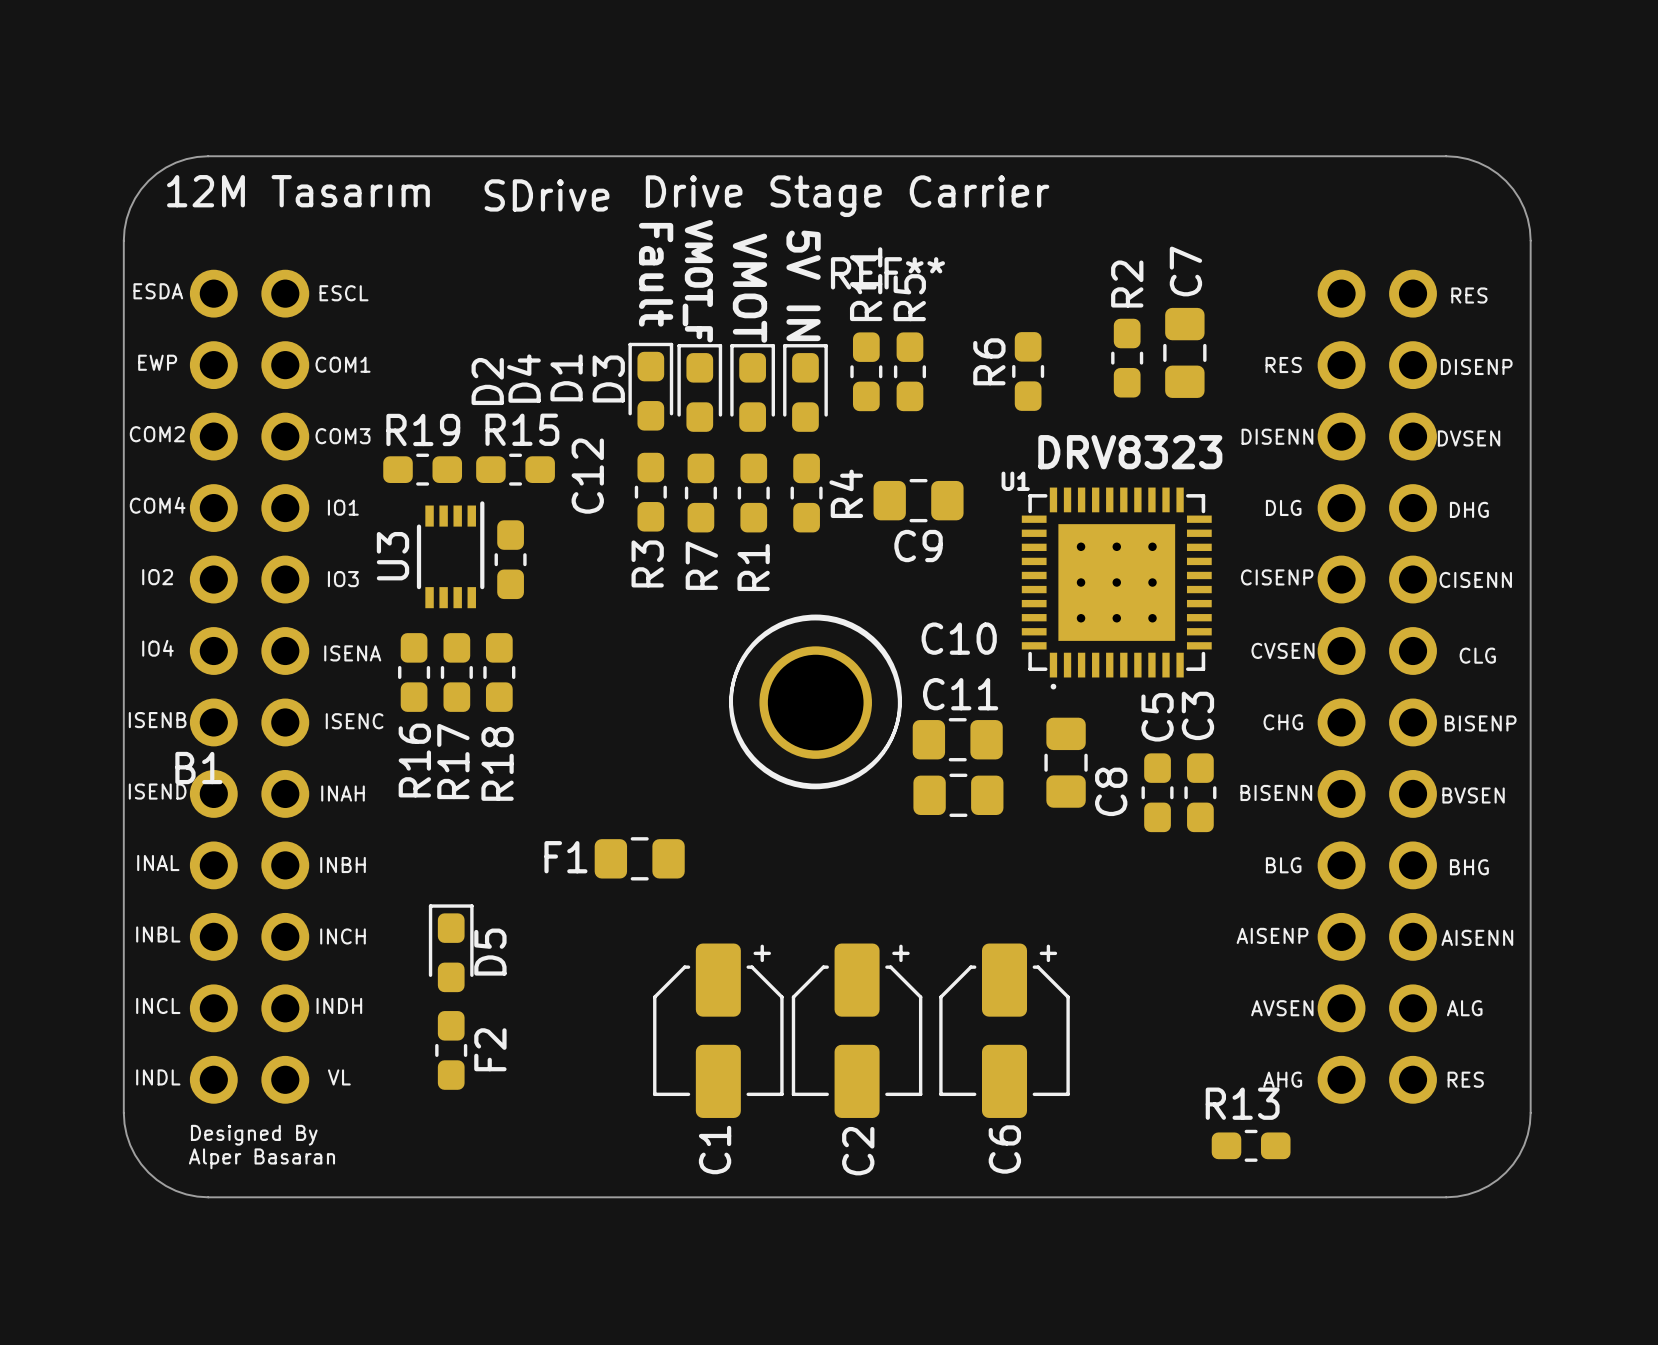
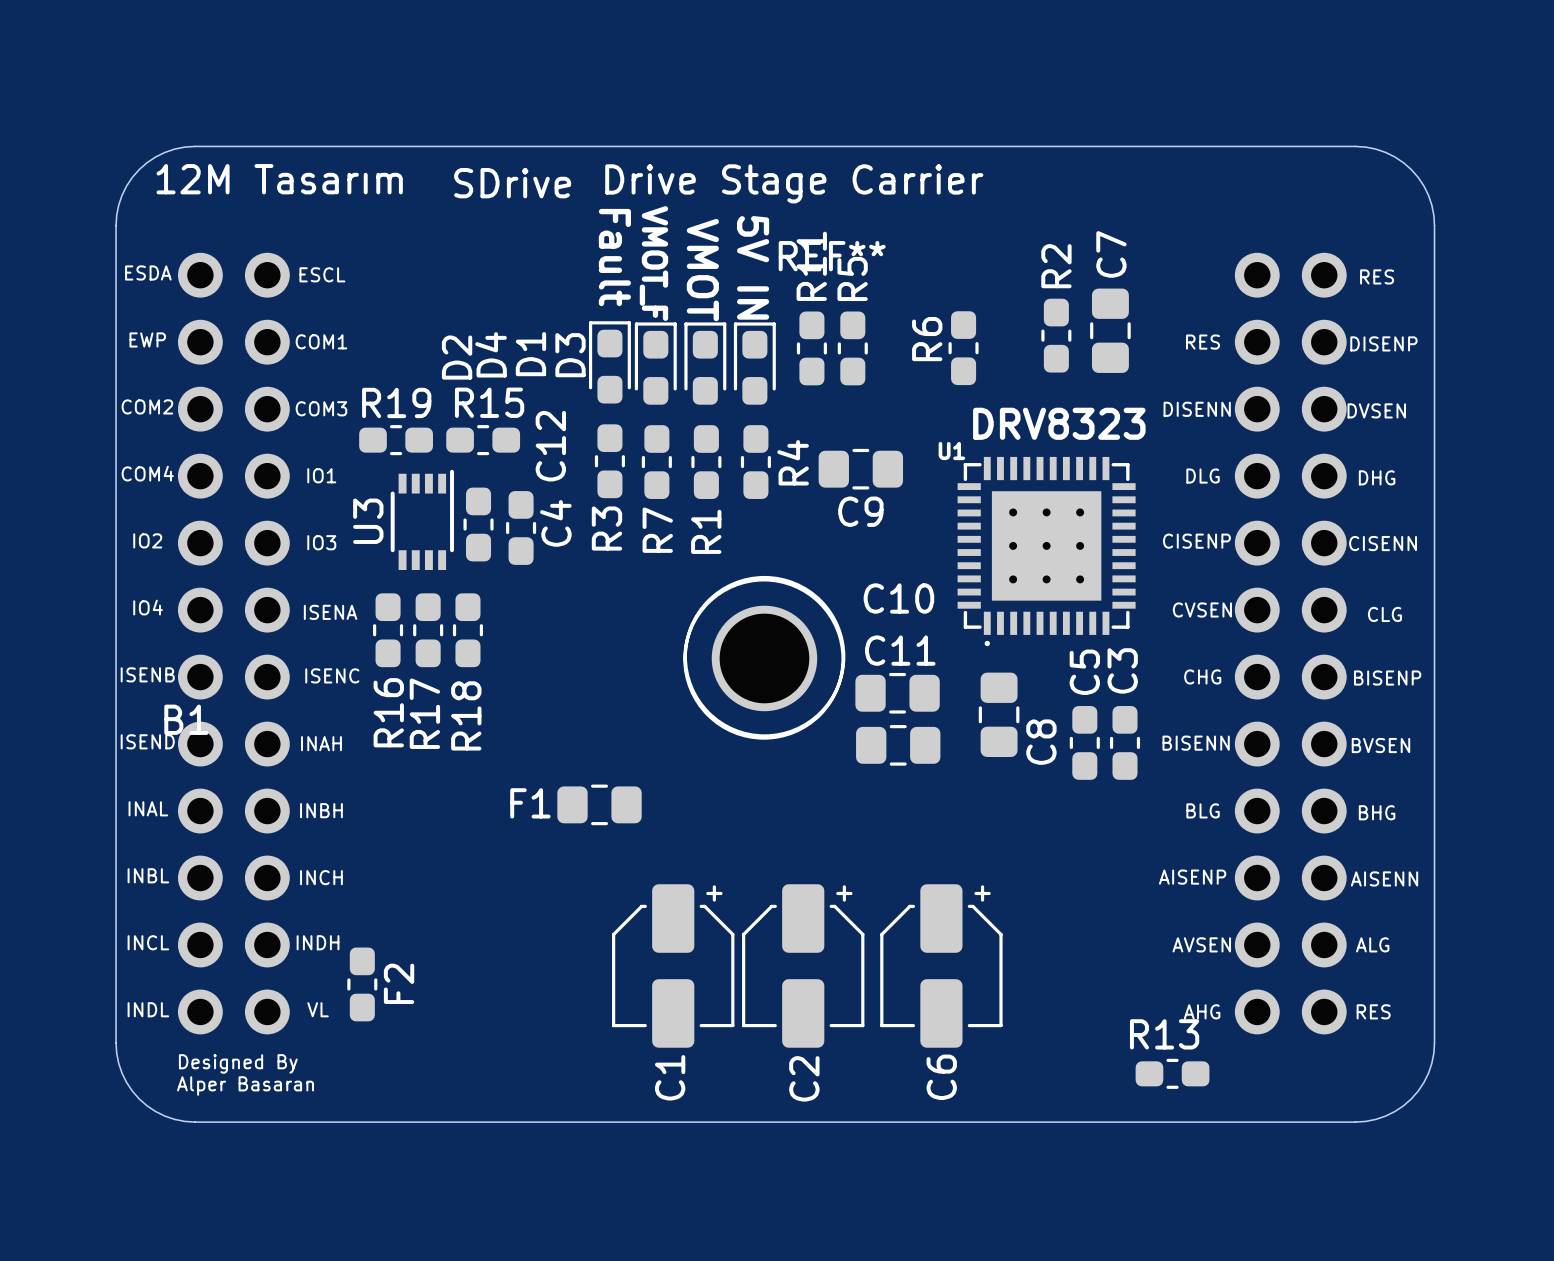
C4: none -> (521, 527)
D5: (451, 948) -> none
F2 position: (451, 1050) -> (362, 984)

